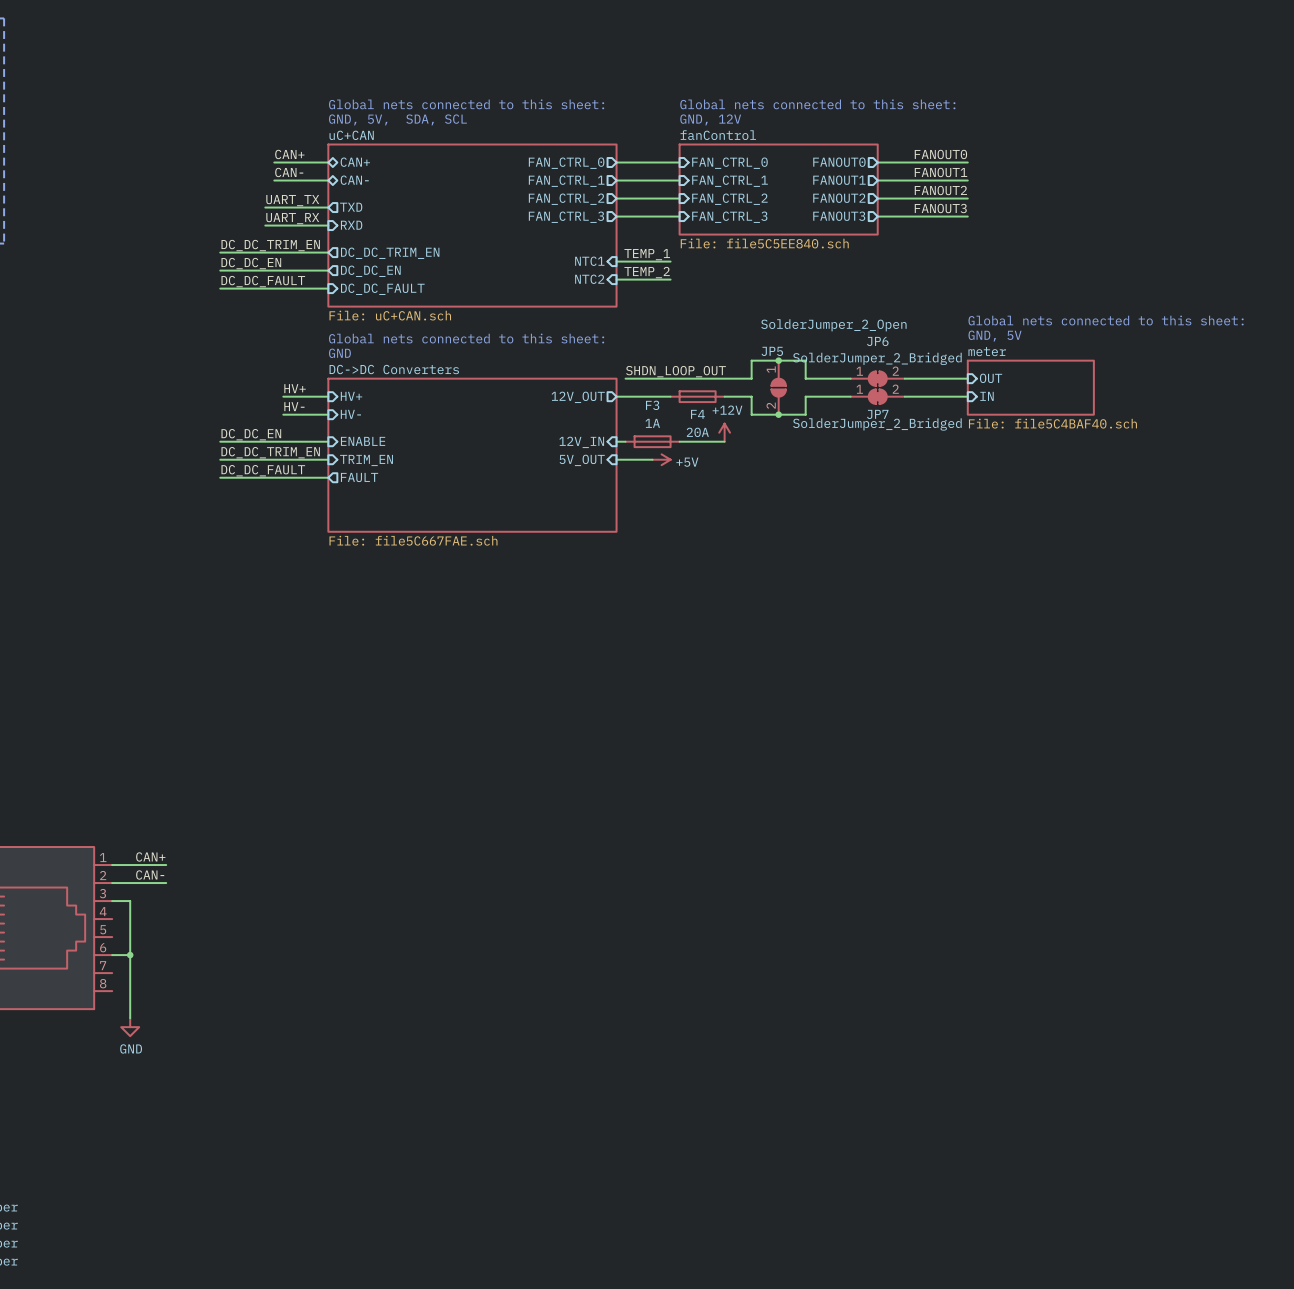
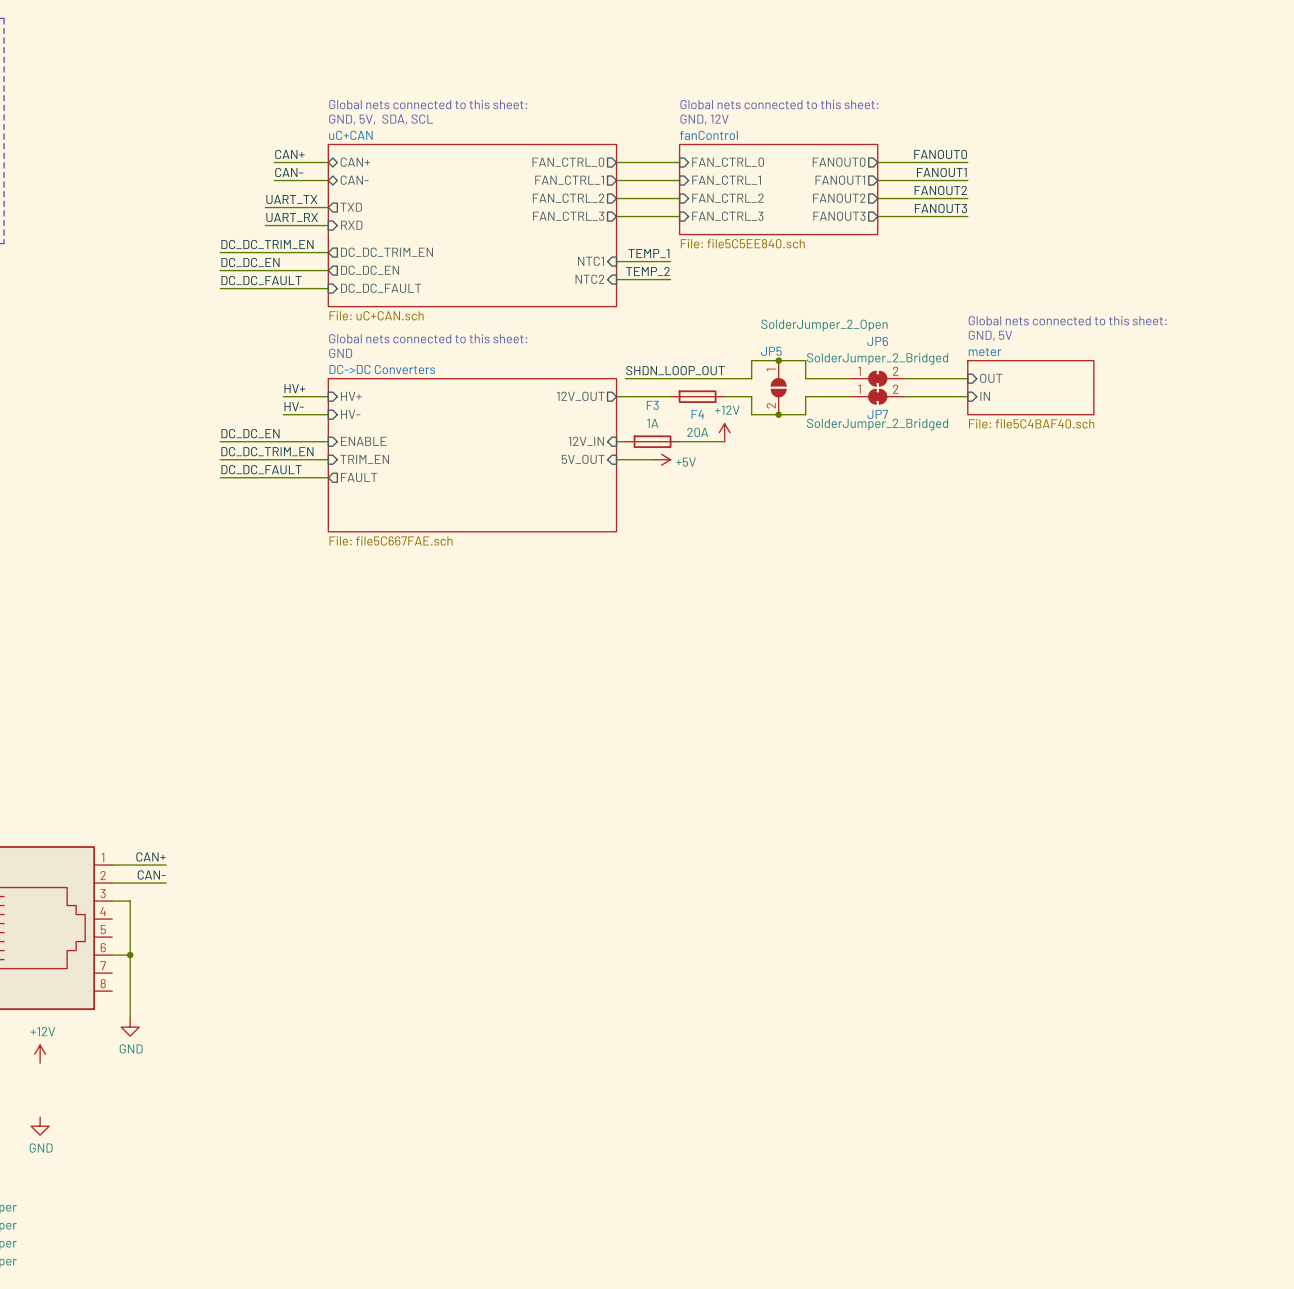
power symbol: none -> +12V (40, 1054)
power symbol: none -> GND (40, 1126)

